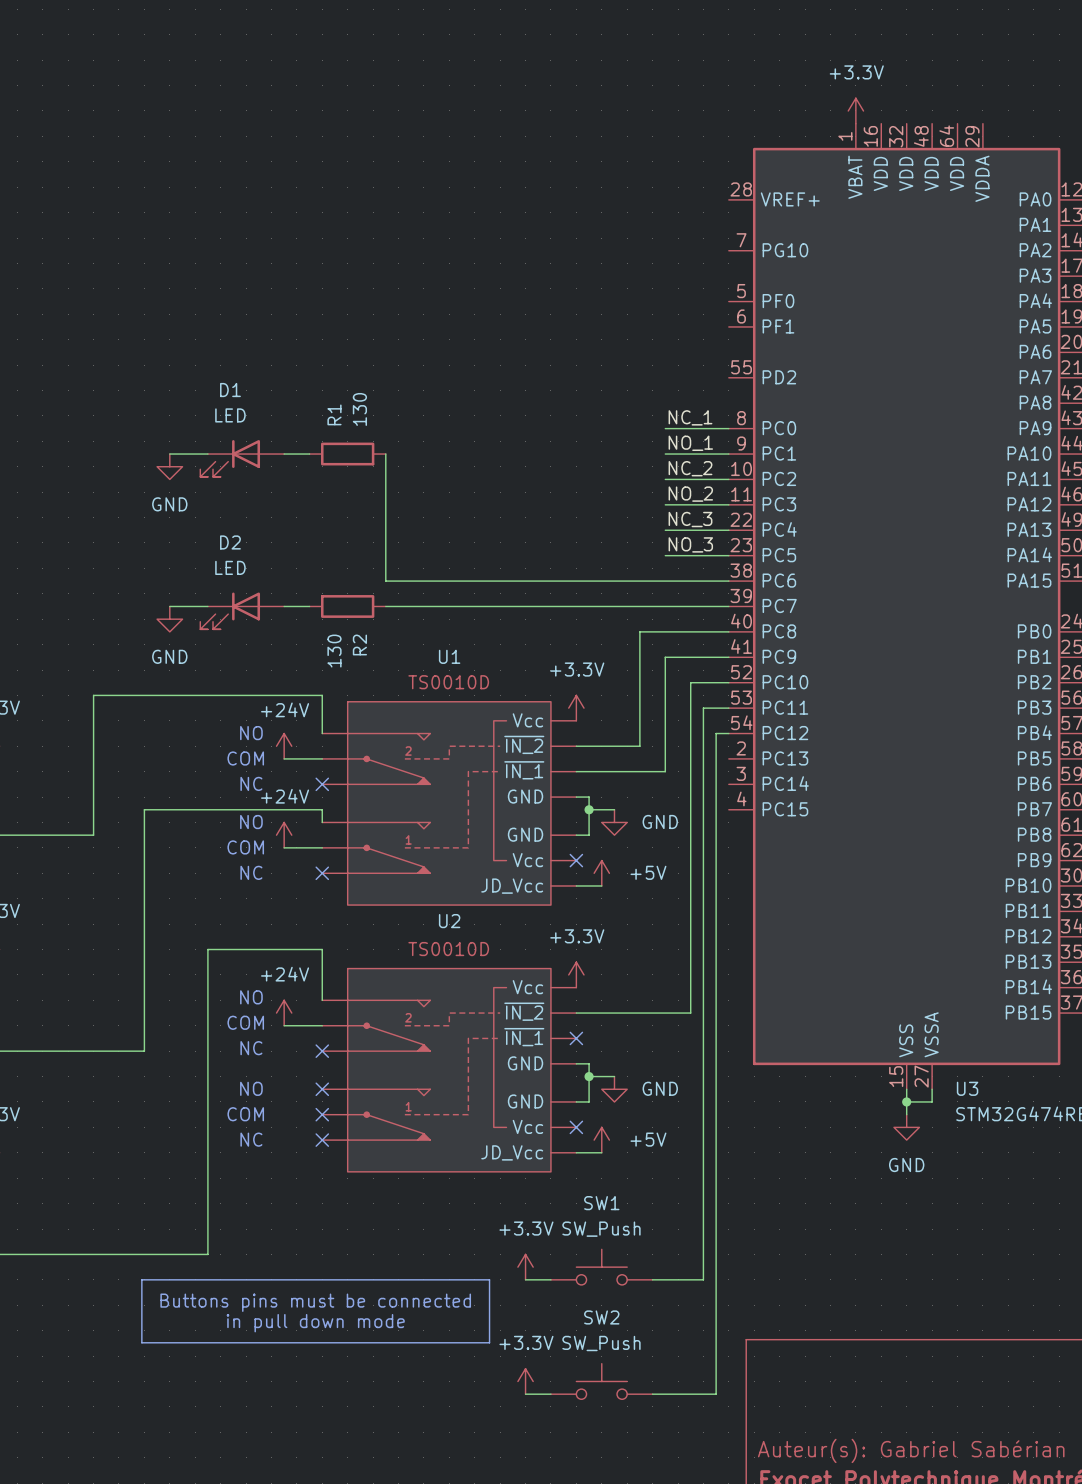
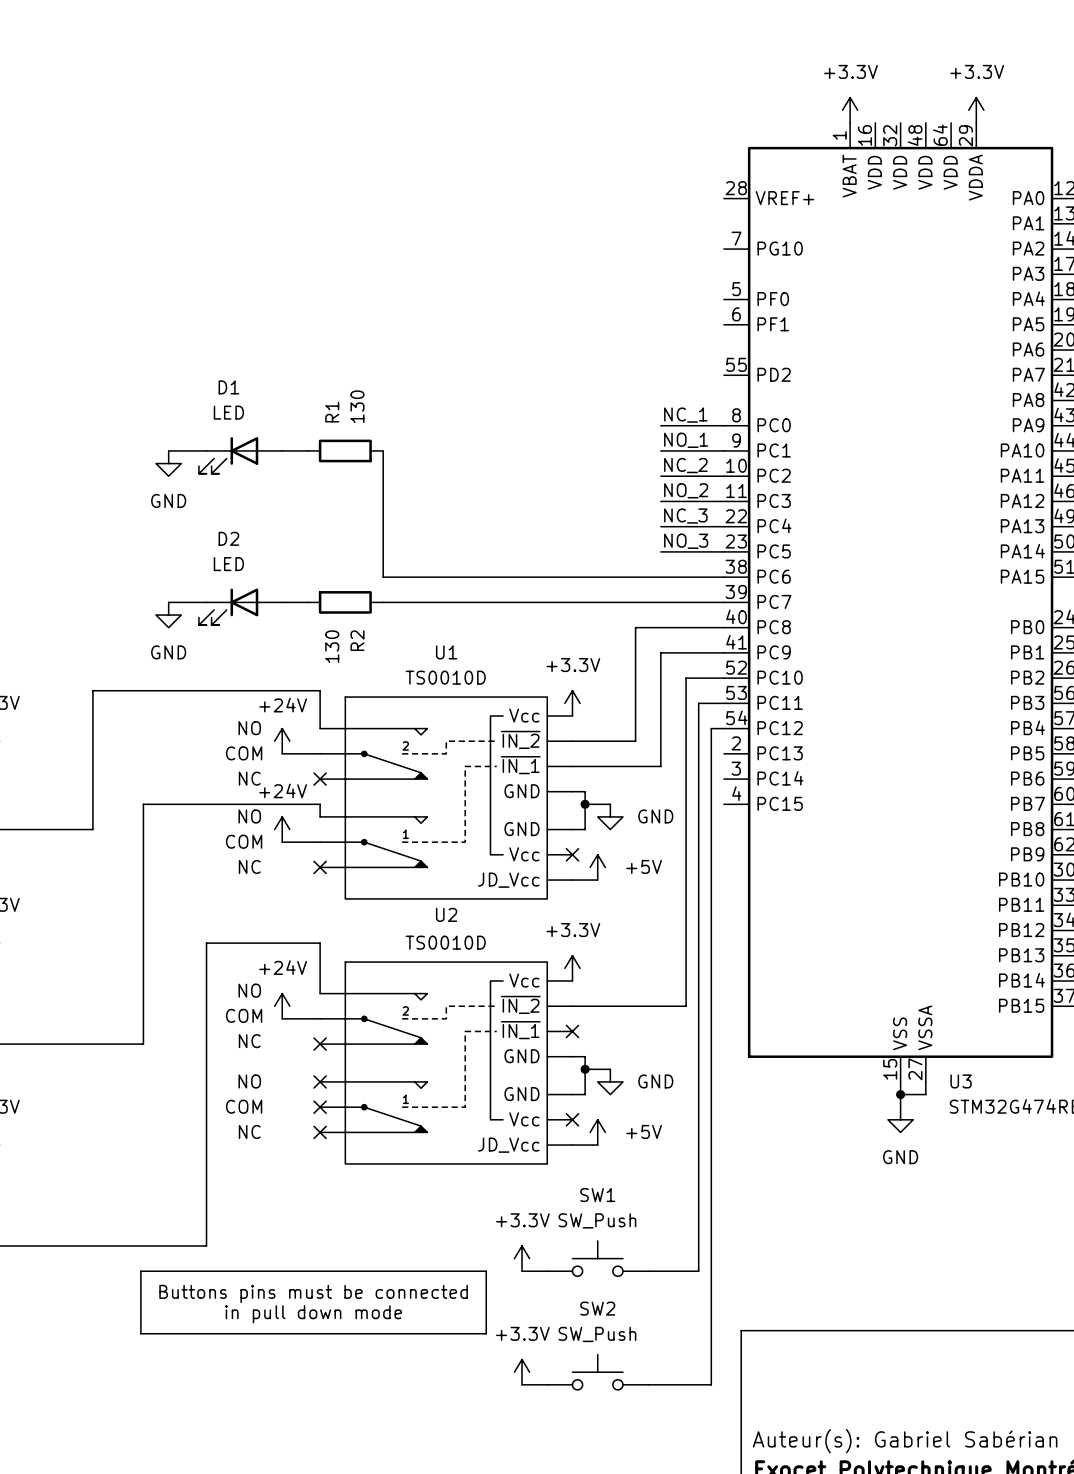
power symbol: none -> +3.3V (976, 110)

